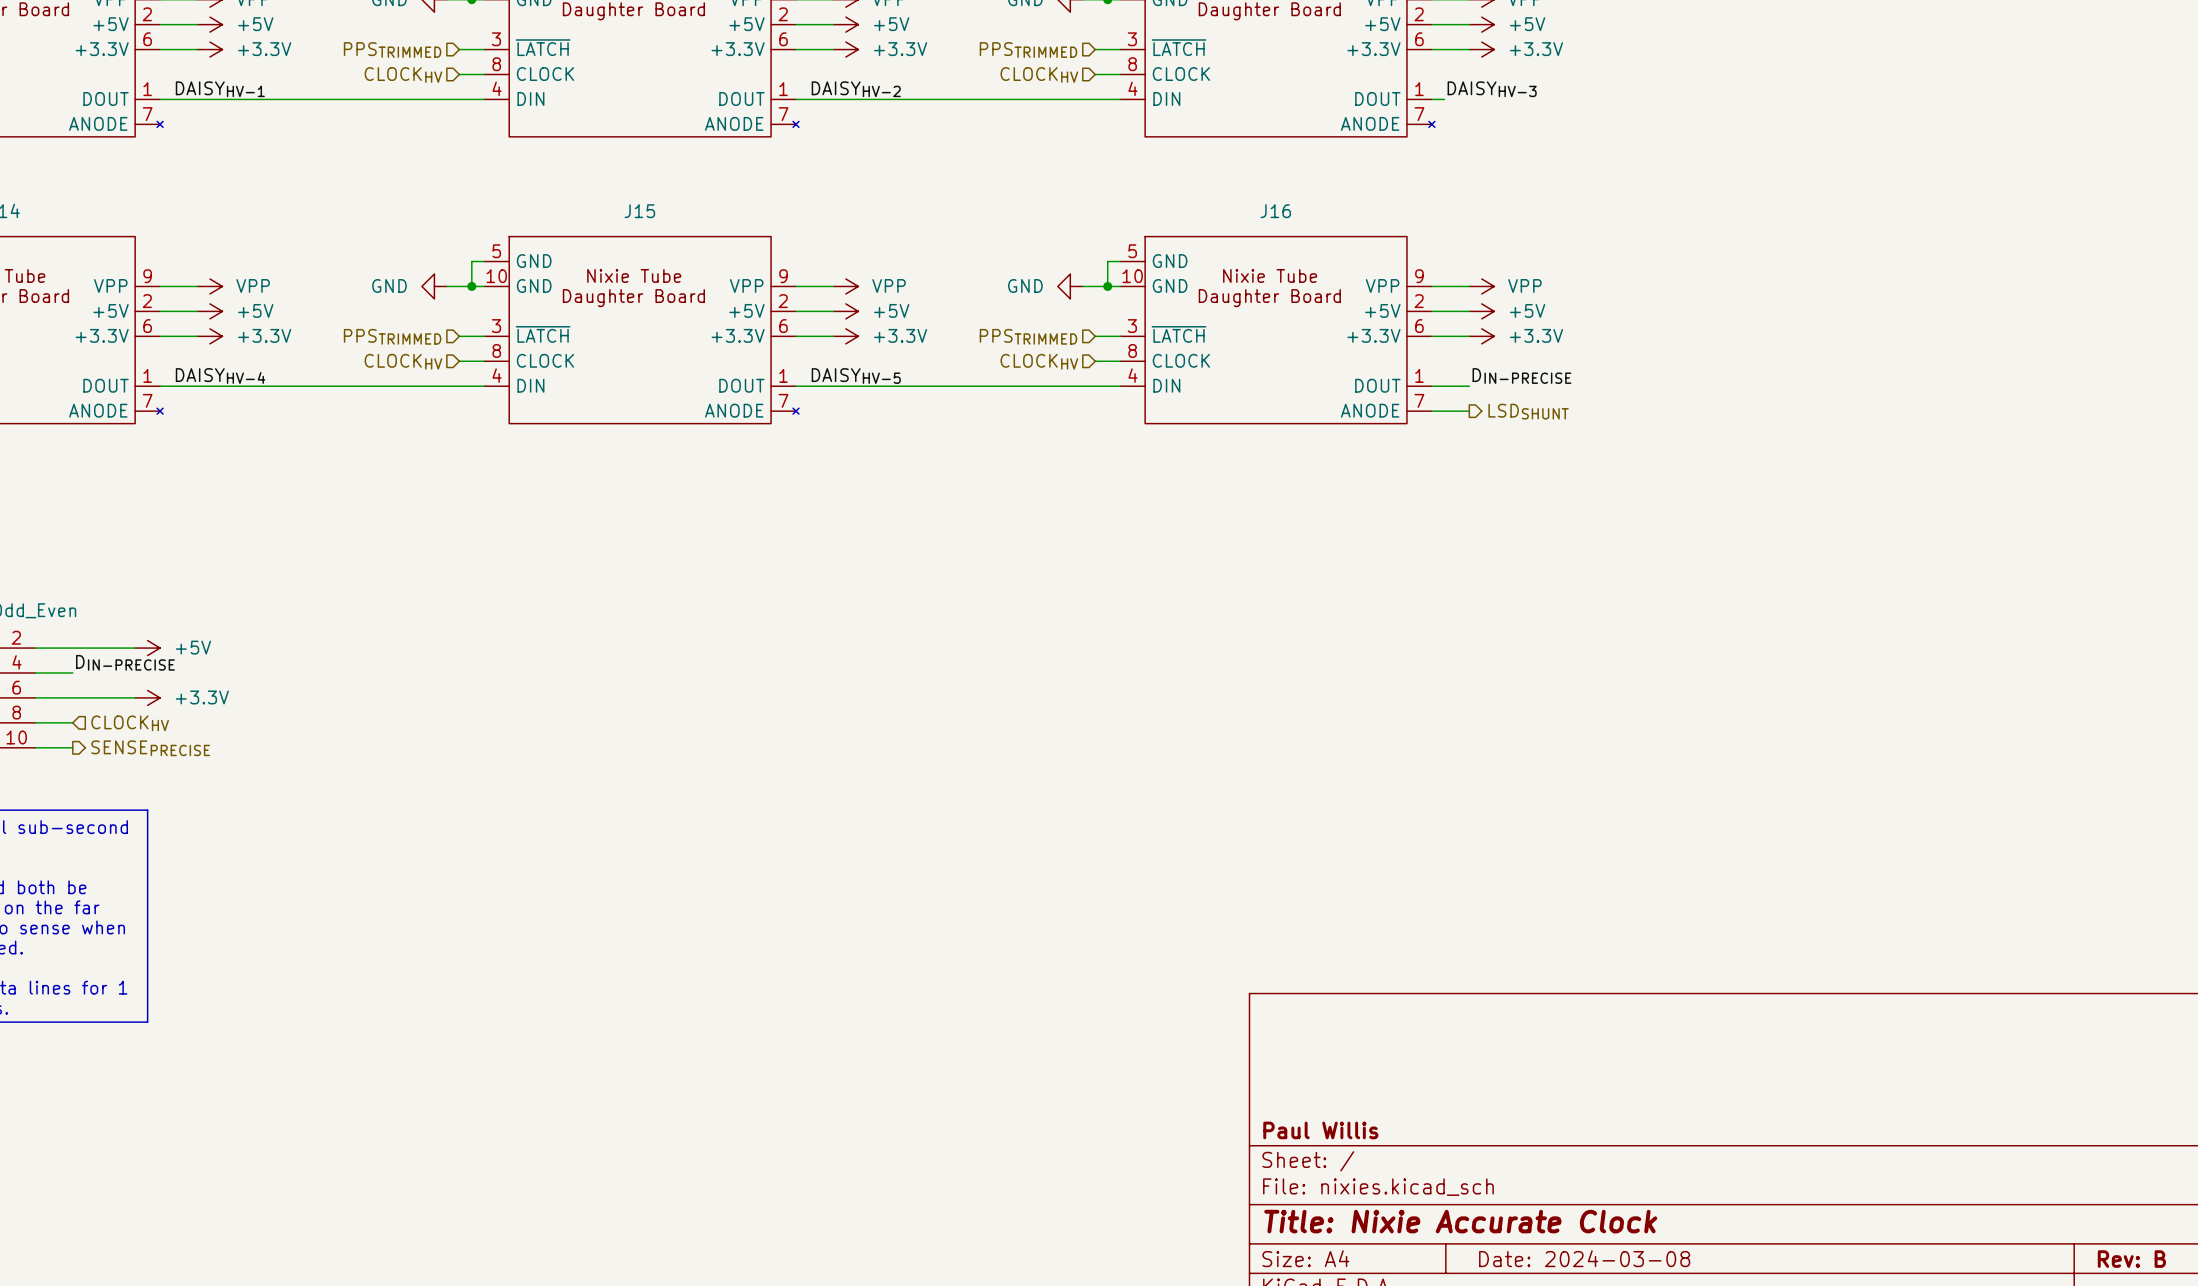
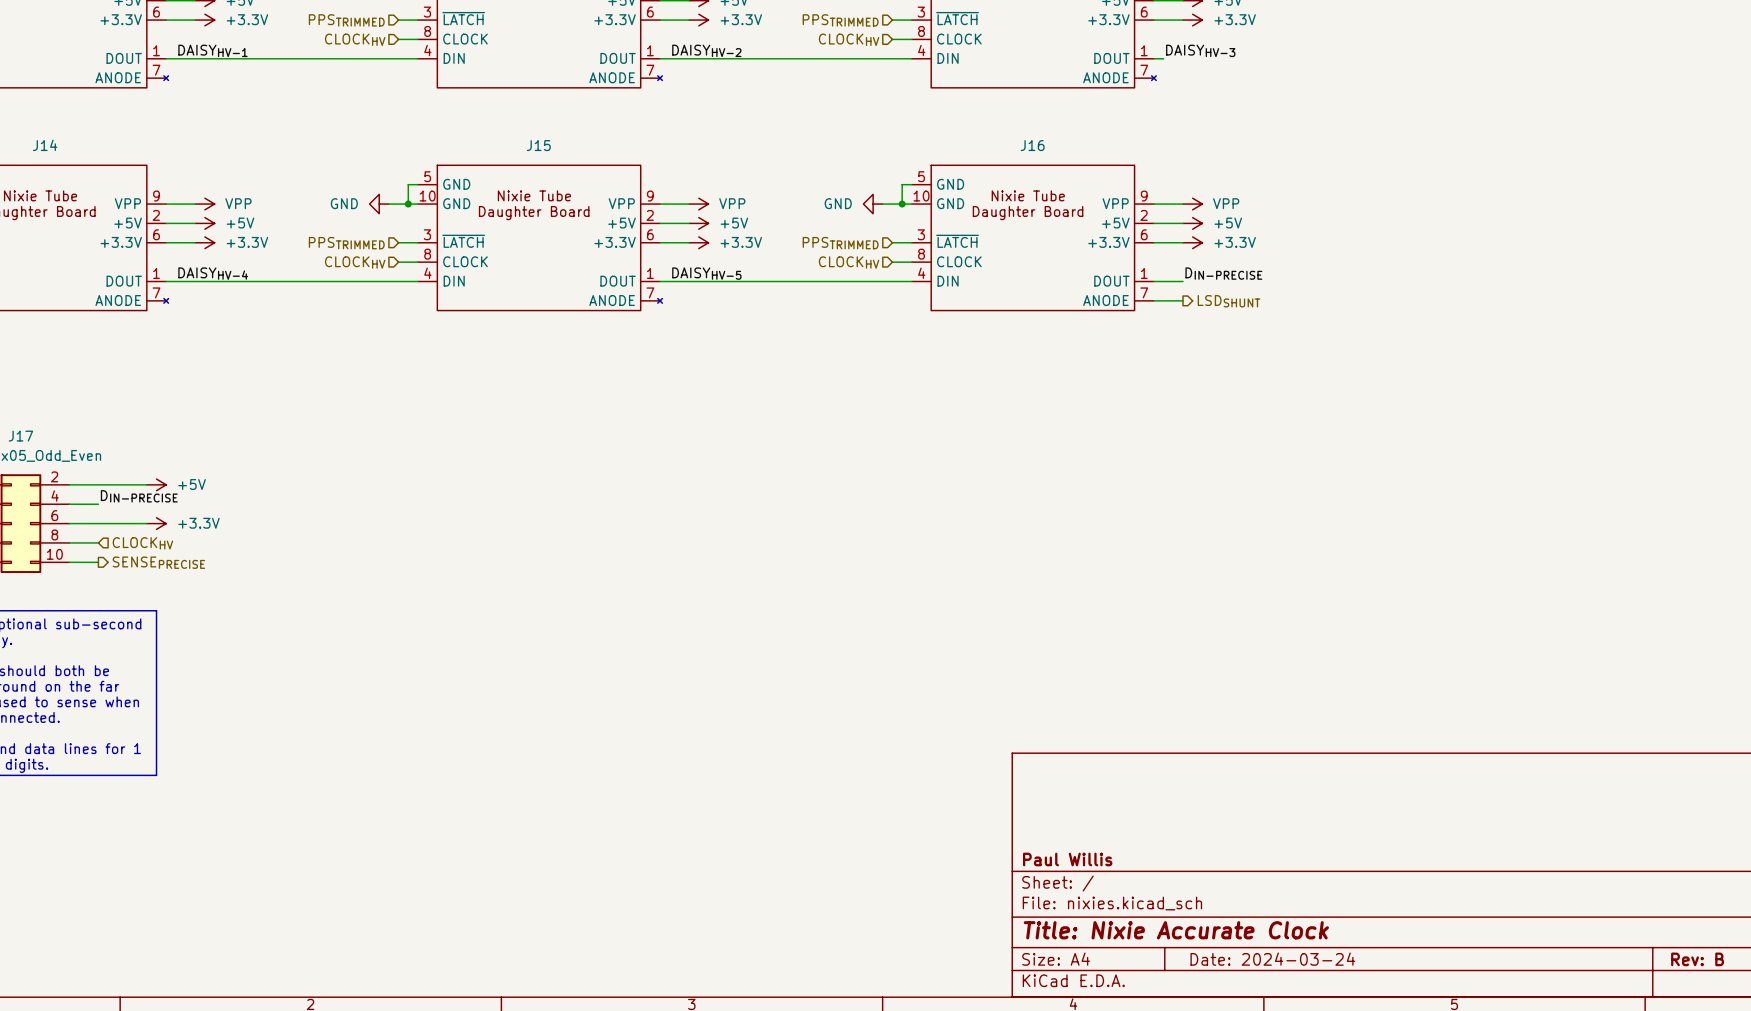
title block: Date: 2024-03-08 (1584, 1258) -> Date: 2024-03-24 (1272, 959)

